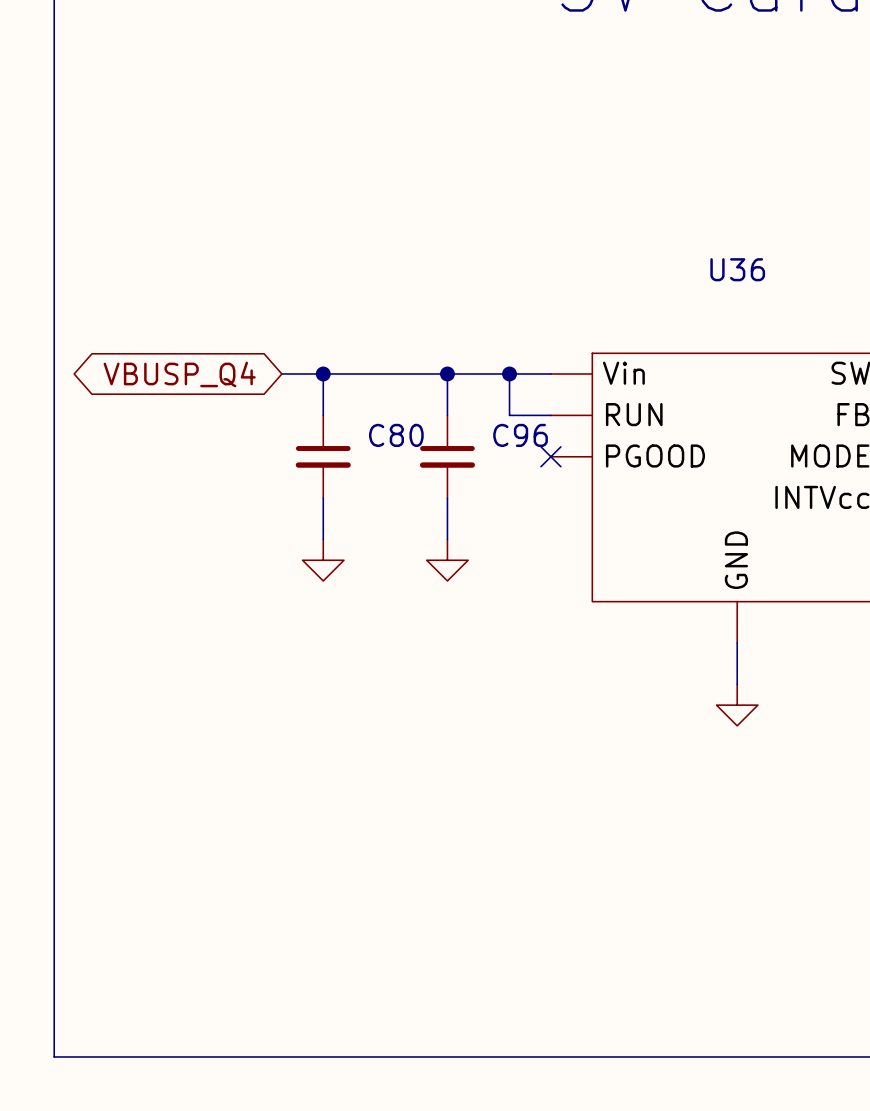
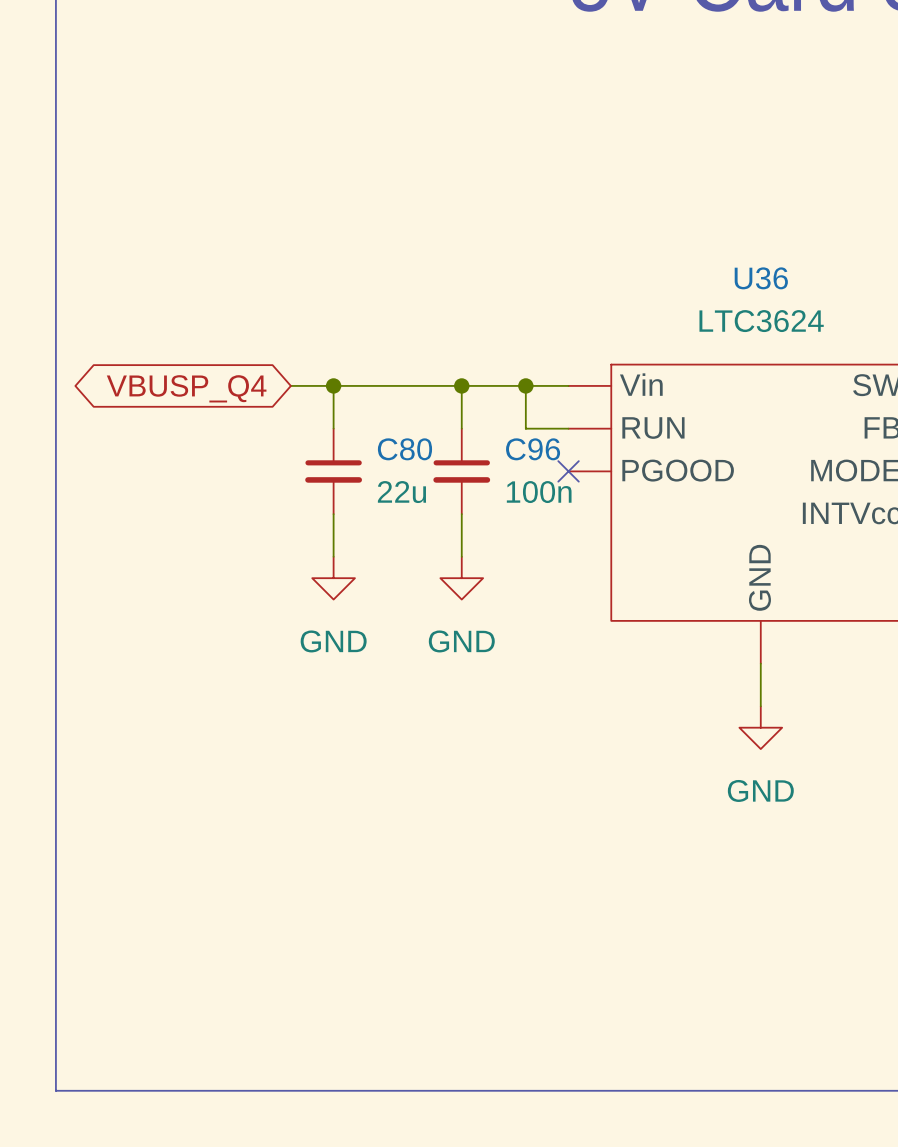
U36 value: none -> LTC3624 (761, 321)
C80 value: none -> 22u (401, 492)
C96 value: none -> 100n (539, 492)
power symbol text: none -> GND (333, 641)
power symbol text: none -> GND (461, 641)
power symbol text: none -> GND (760, 790)

